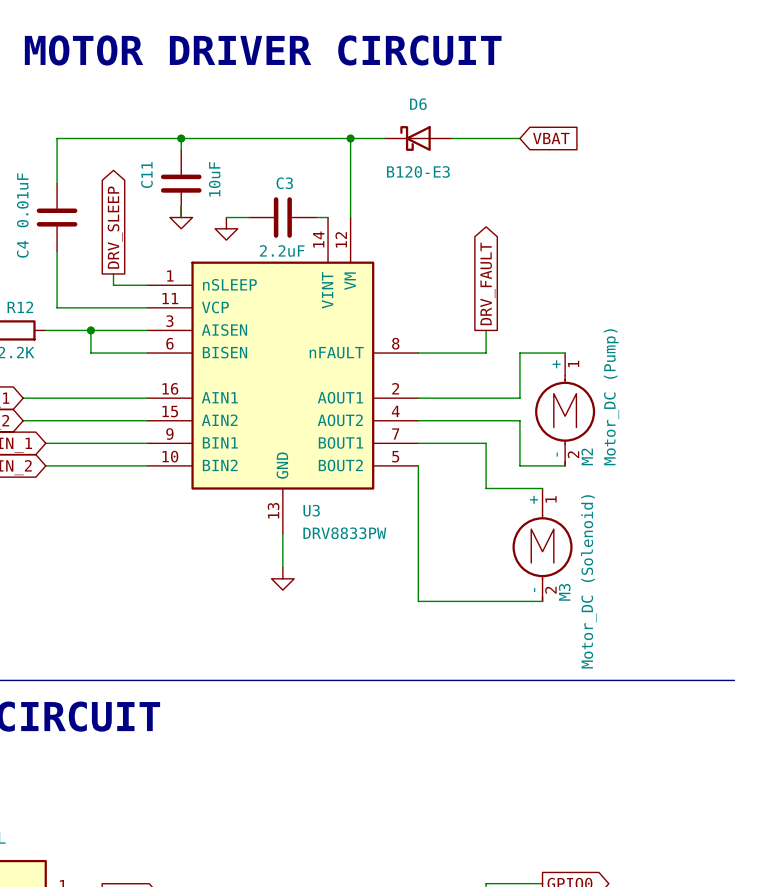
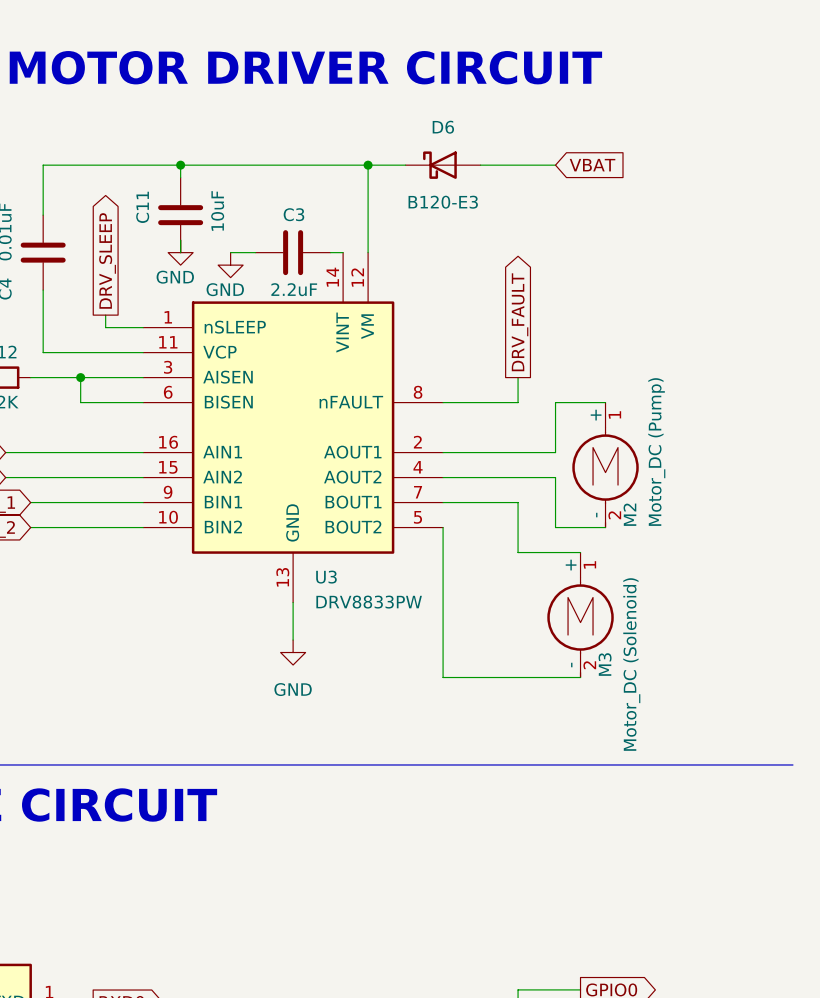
power symbol text: none -> GND (175, 277)
power symbol text: none -> GND (225, 289)
power symbol text: none -> GND (293, 689)

